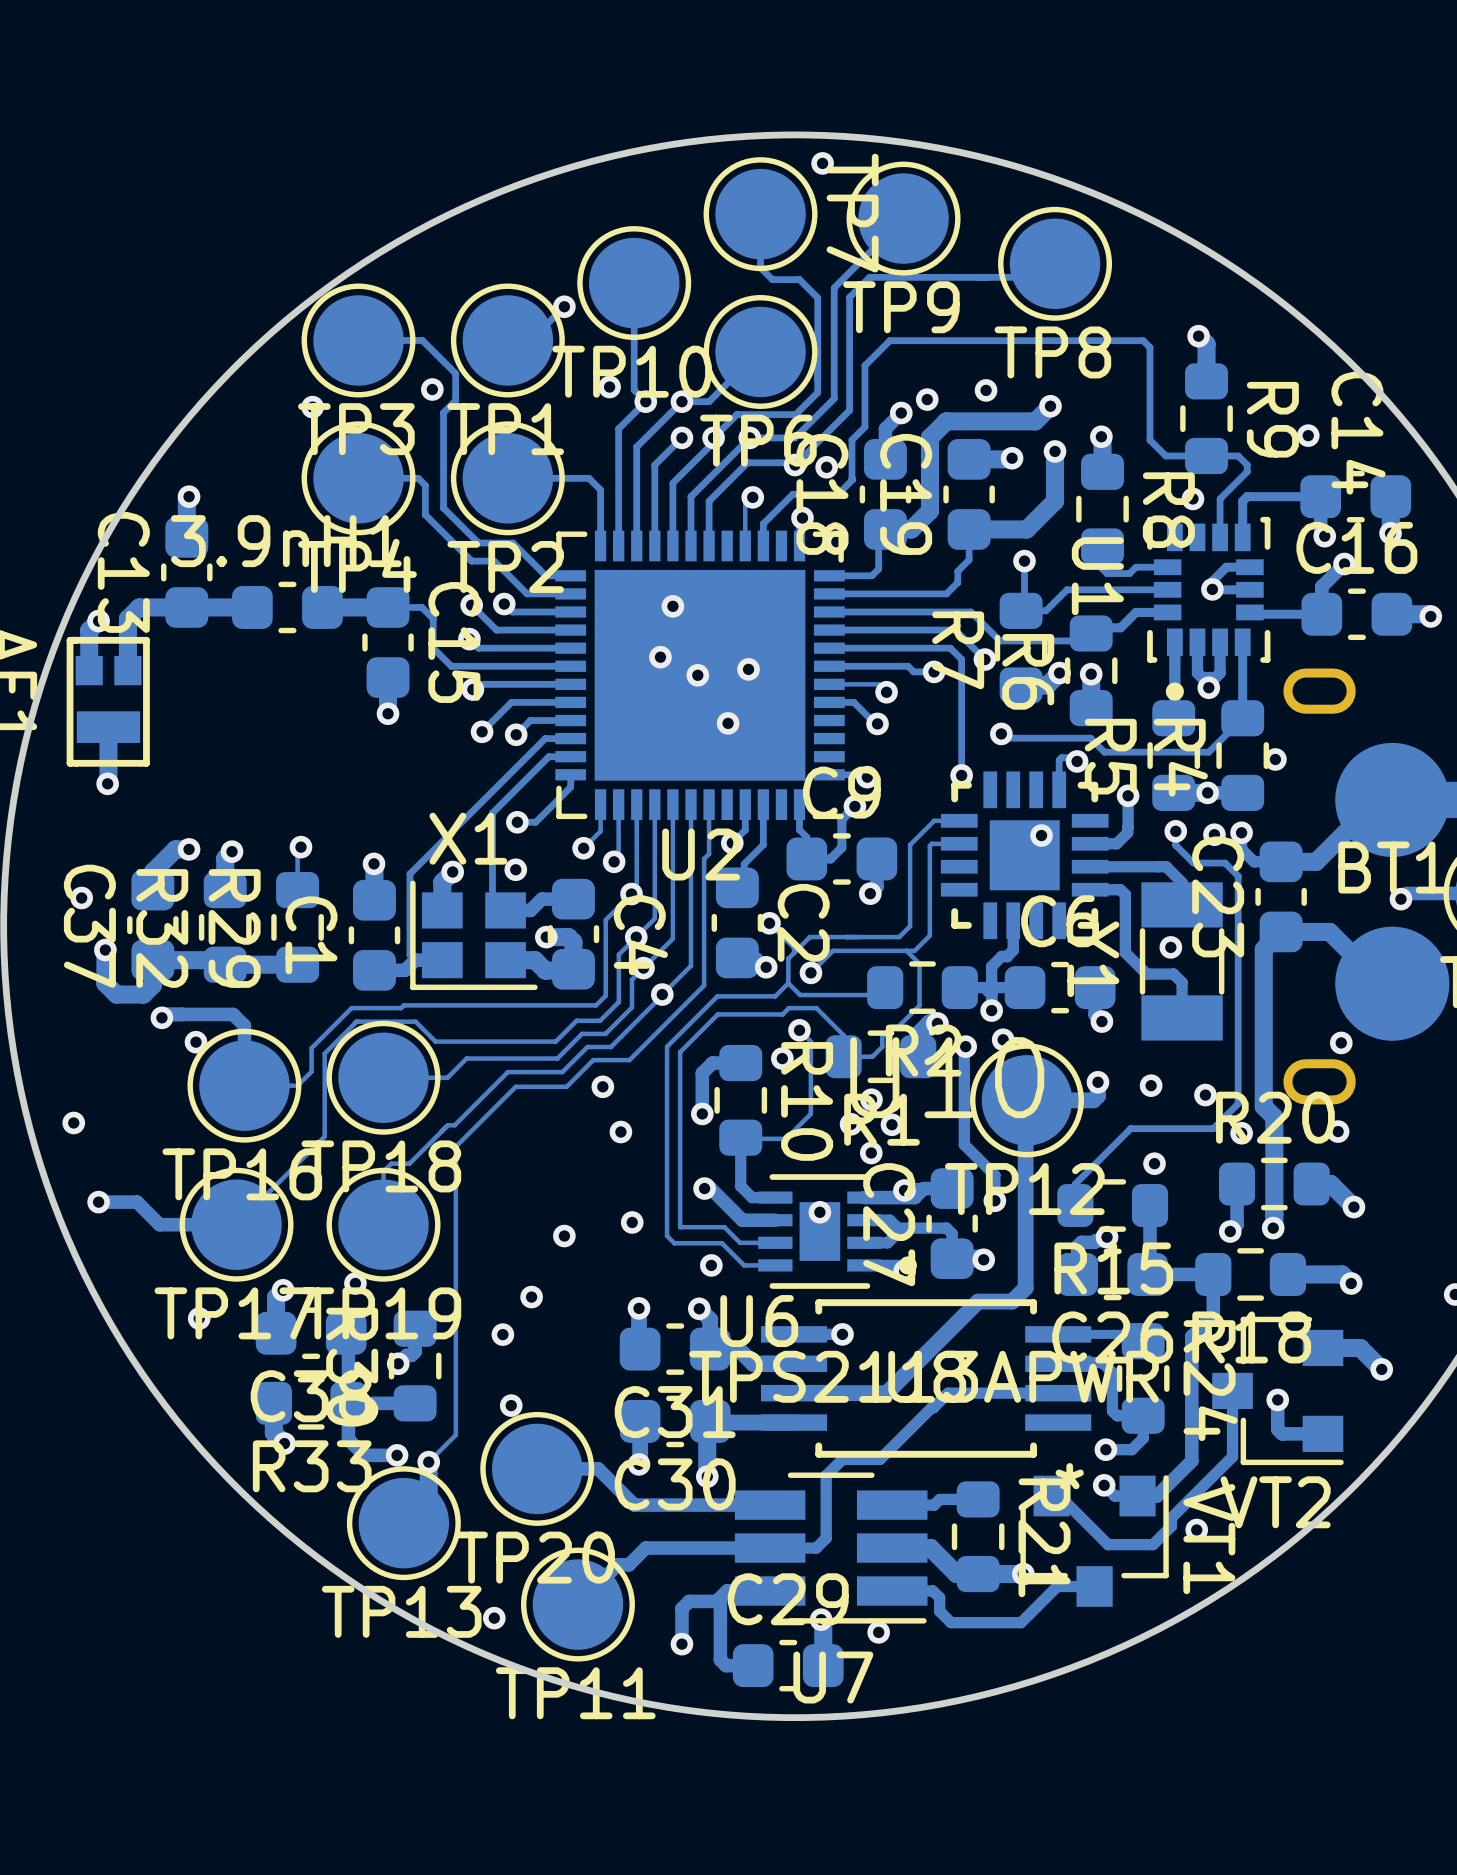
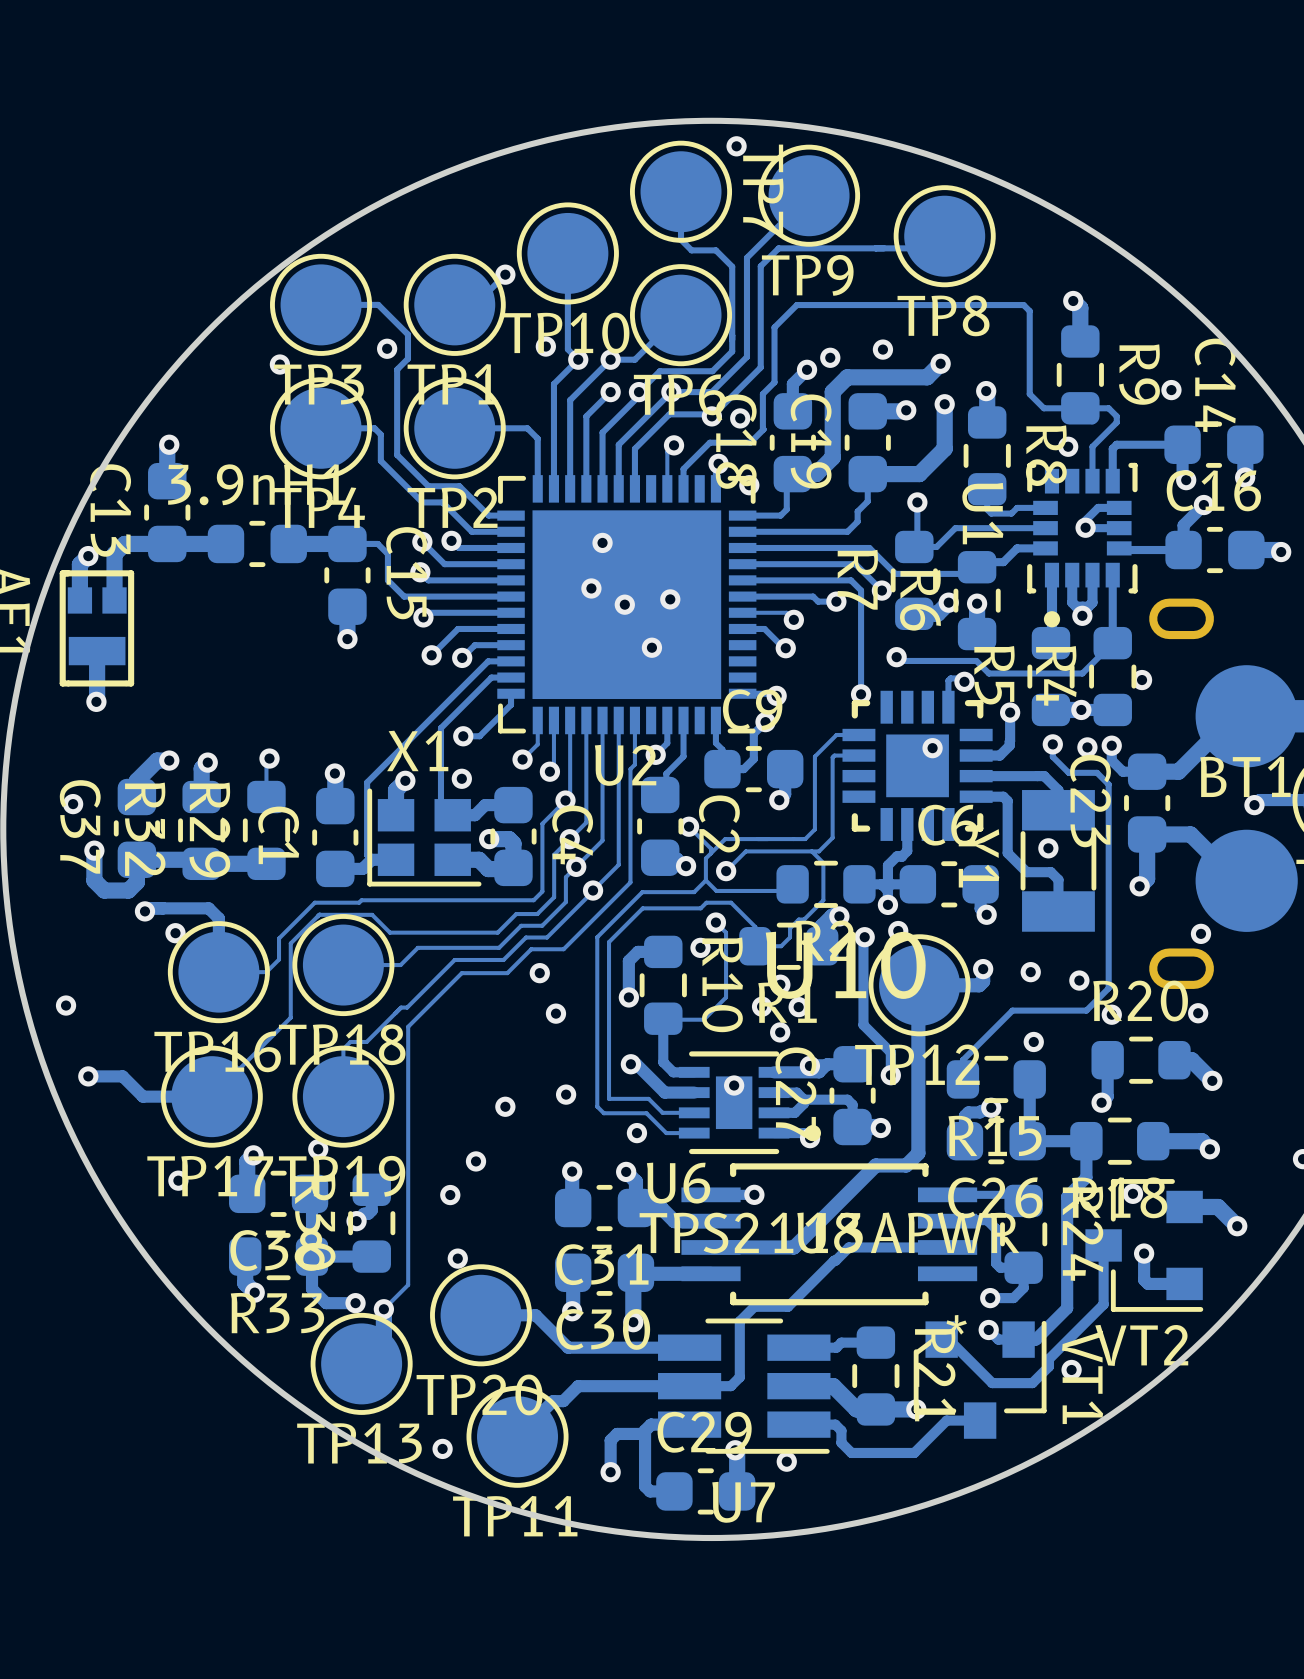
track: (1281, 931) (1263, 949) (1263, 1106) (1274, 1117) (1273, 1228) -> (1147, 834) (1147, 878) (1139, 886)
via: none -> (1139, 886)
via position: (1273, 1228) -> (1132, 1193)

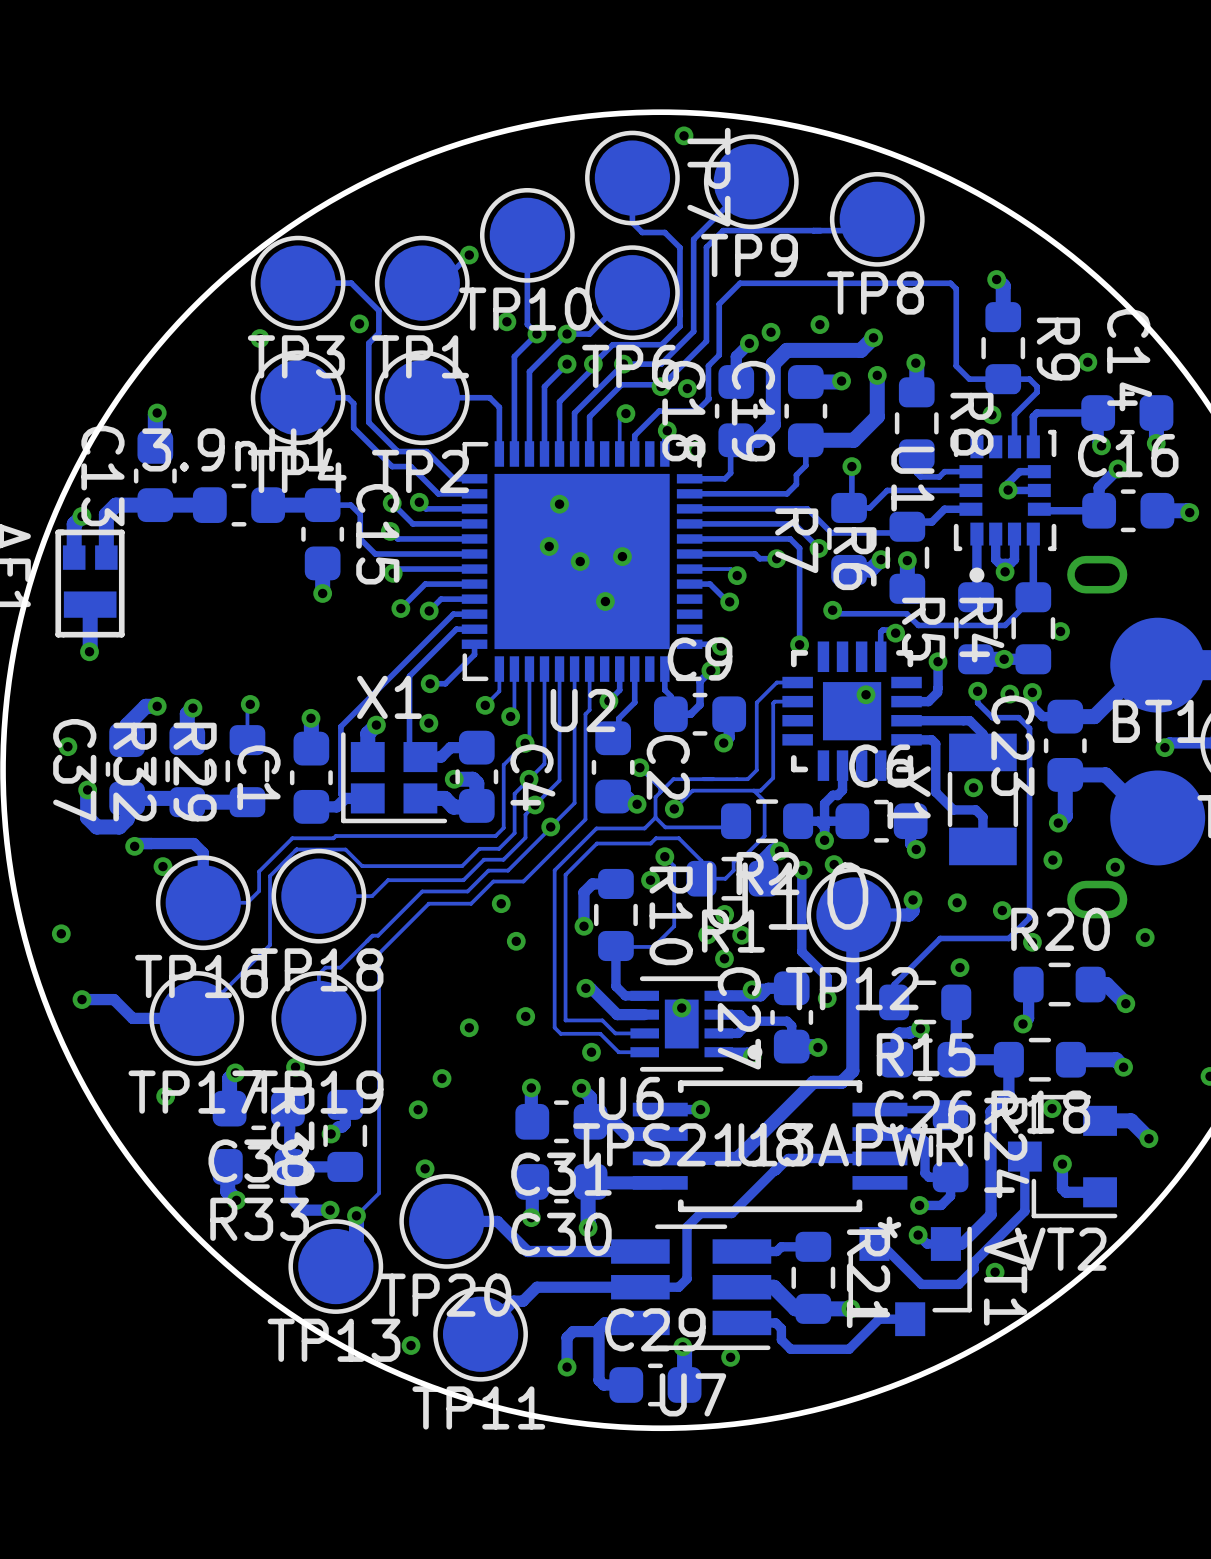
via: none -> (1052, 860)
via position: (1198, 1013) -> (1145, 937)

